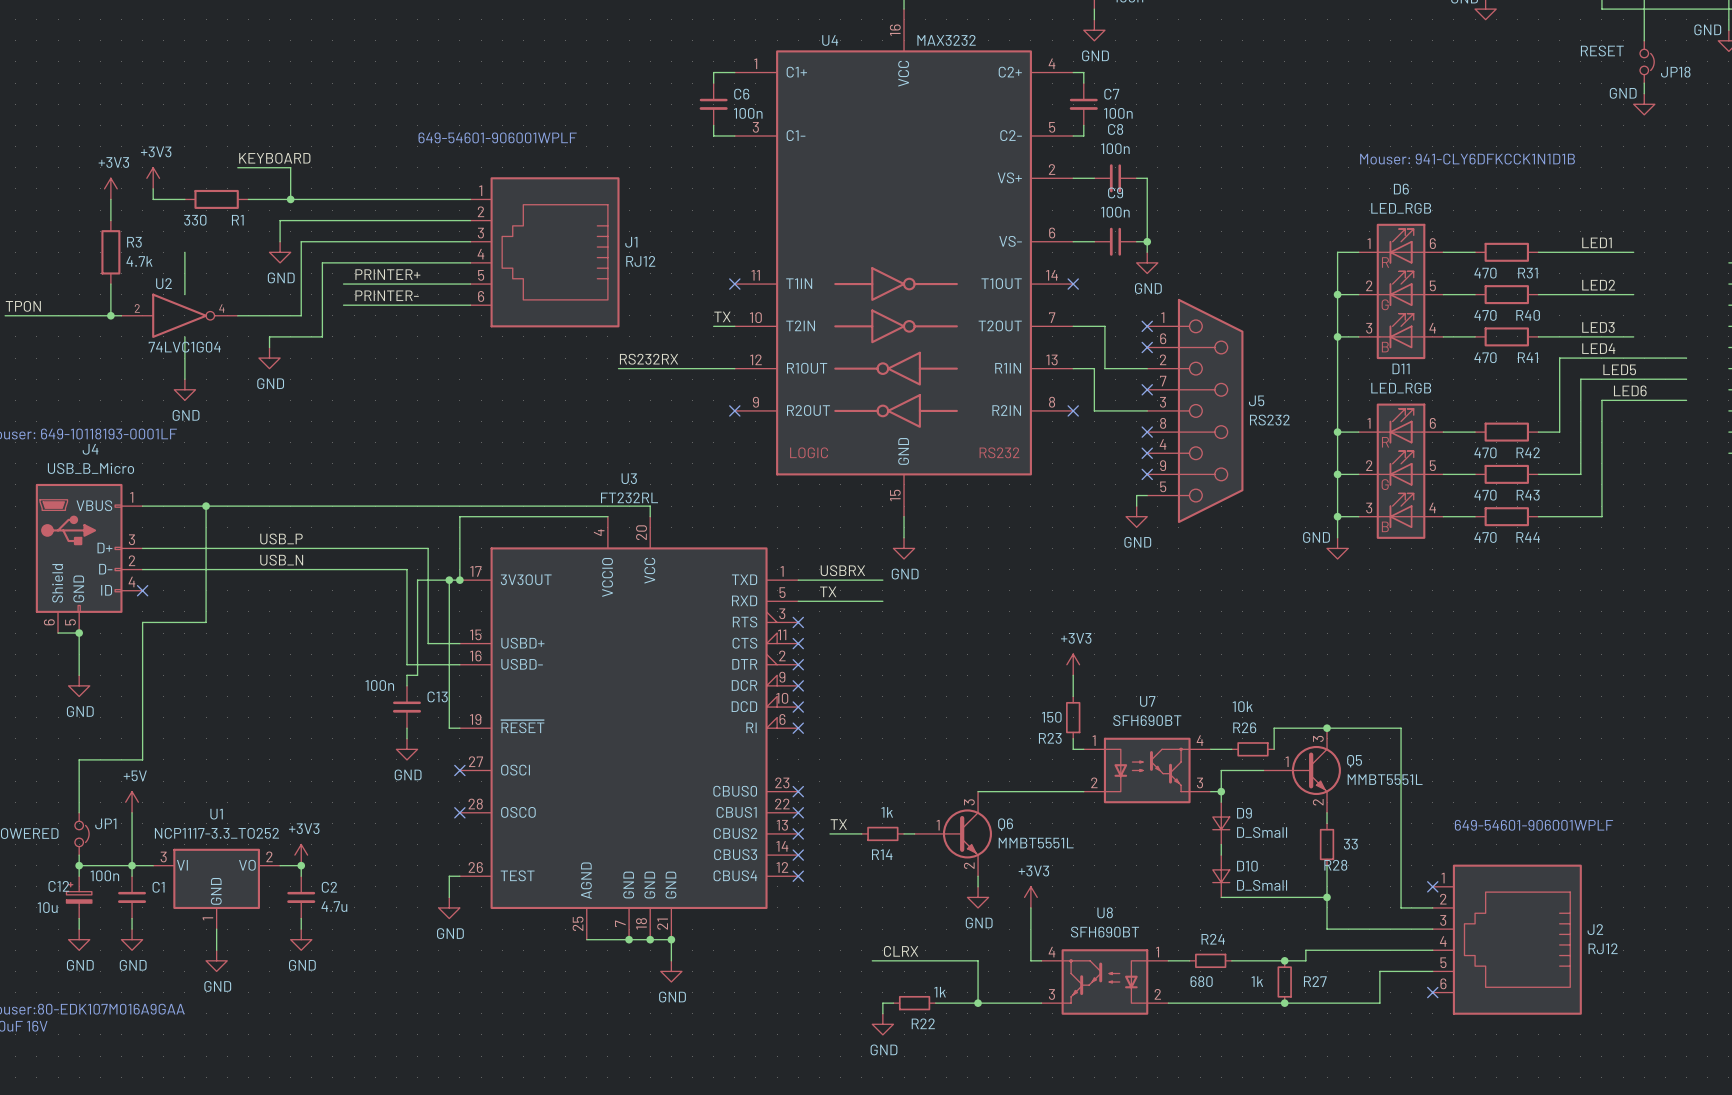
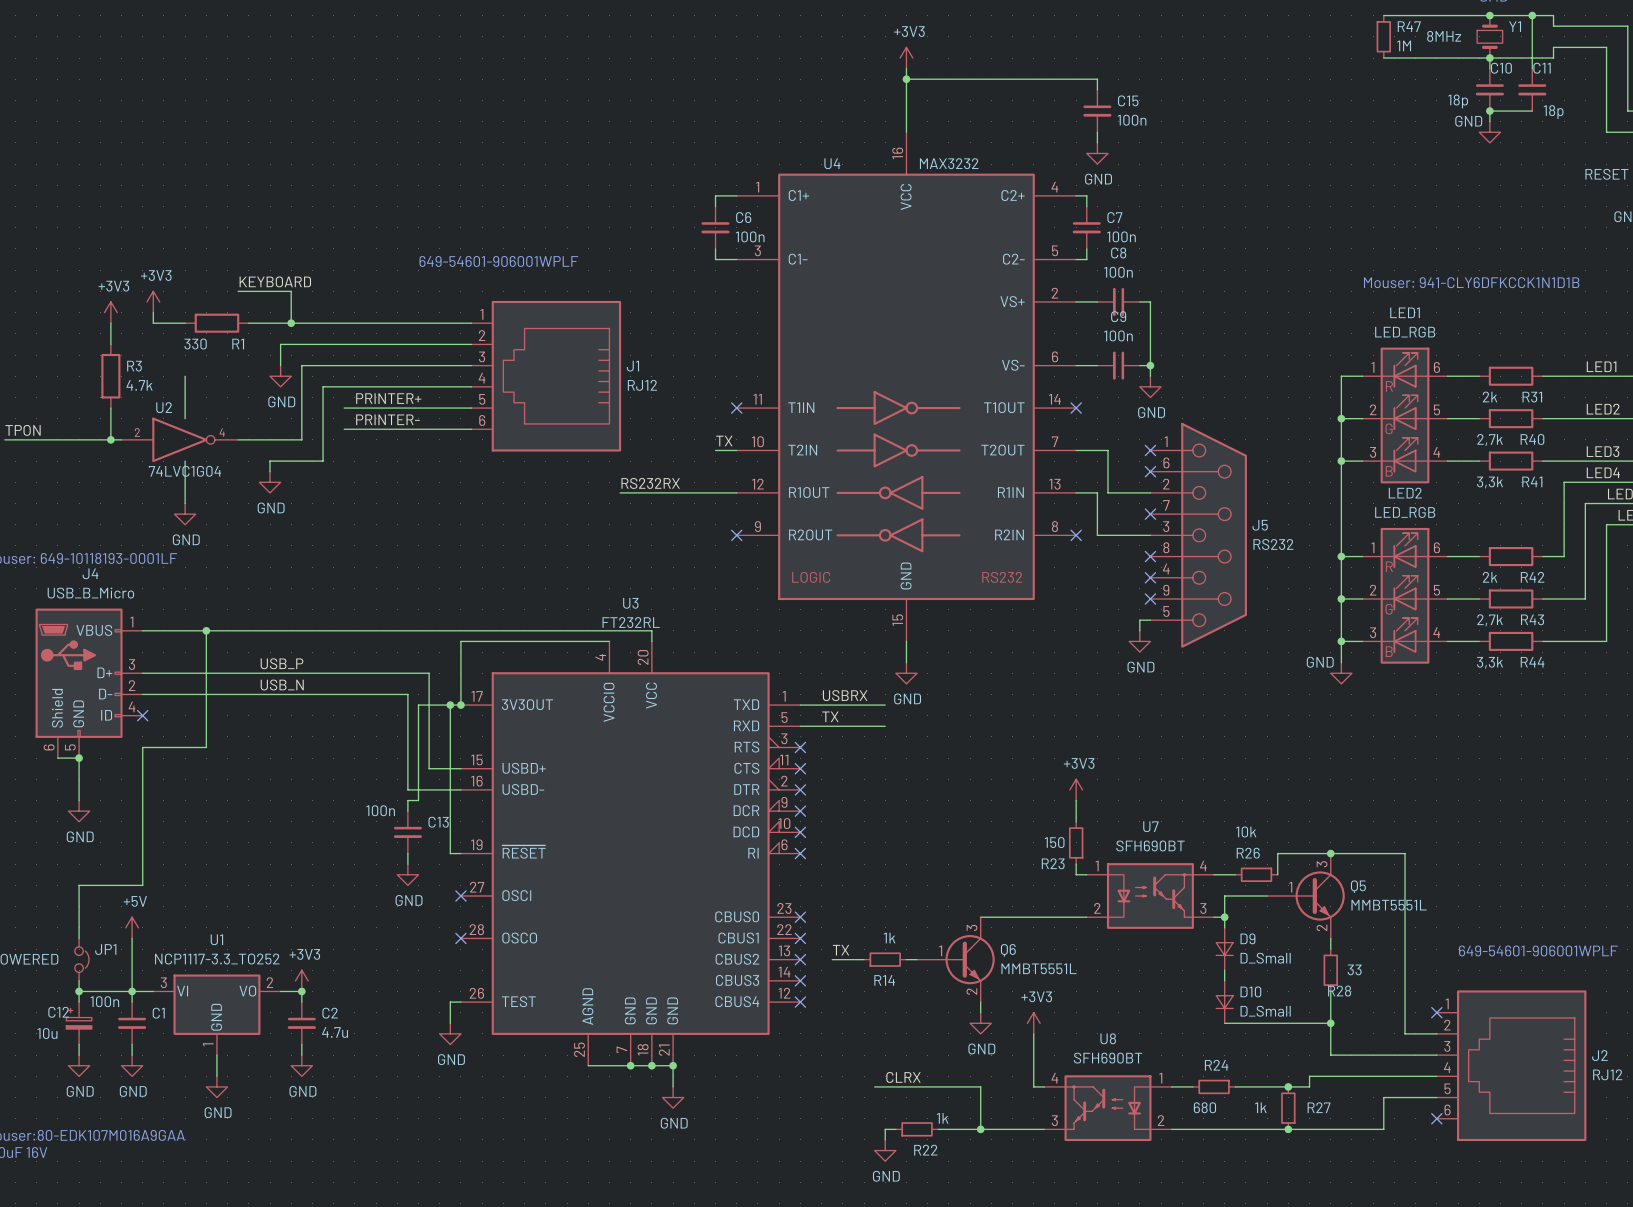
D6 name: D6 (1401, 189) -> LED1 (1405, 312)
R31 value: 470 (1485, 273) -> 2k (1490, 396)
R40 value: 470 (1485, 315) -> 2,7k (1490, 440)
R41 value: 470 (1485, 357) -> 3,3k (1490, 482)
D11 name: D11 (1401, 368) -> LED2 (1405, 493)
R42 value: 470 (1485, 452) -> 2k (1490, 577)
R43 value: 470 (1485, 495) -> 2,7k (1490, 620)
R44 value: 470 (1485, 537) -> 3,3k (1490, 662)

